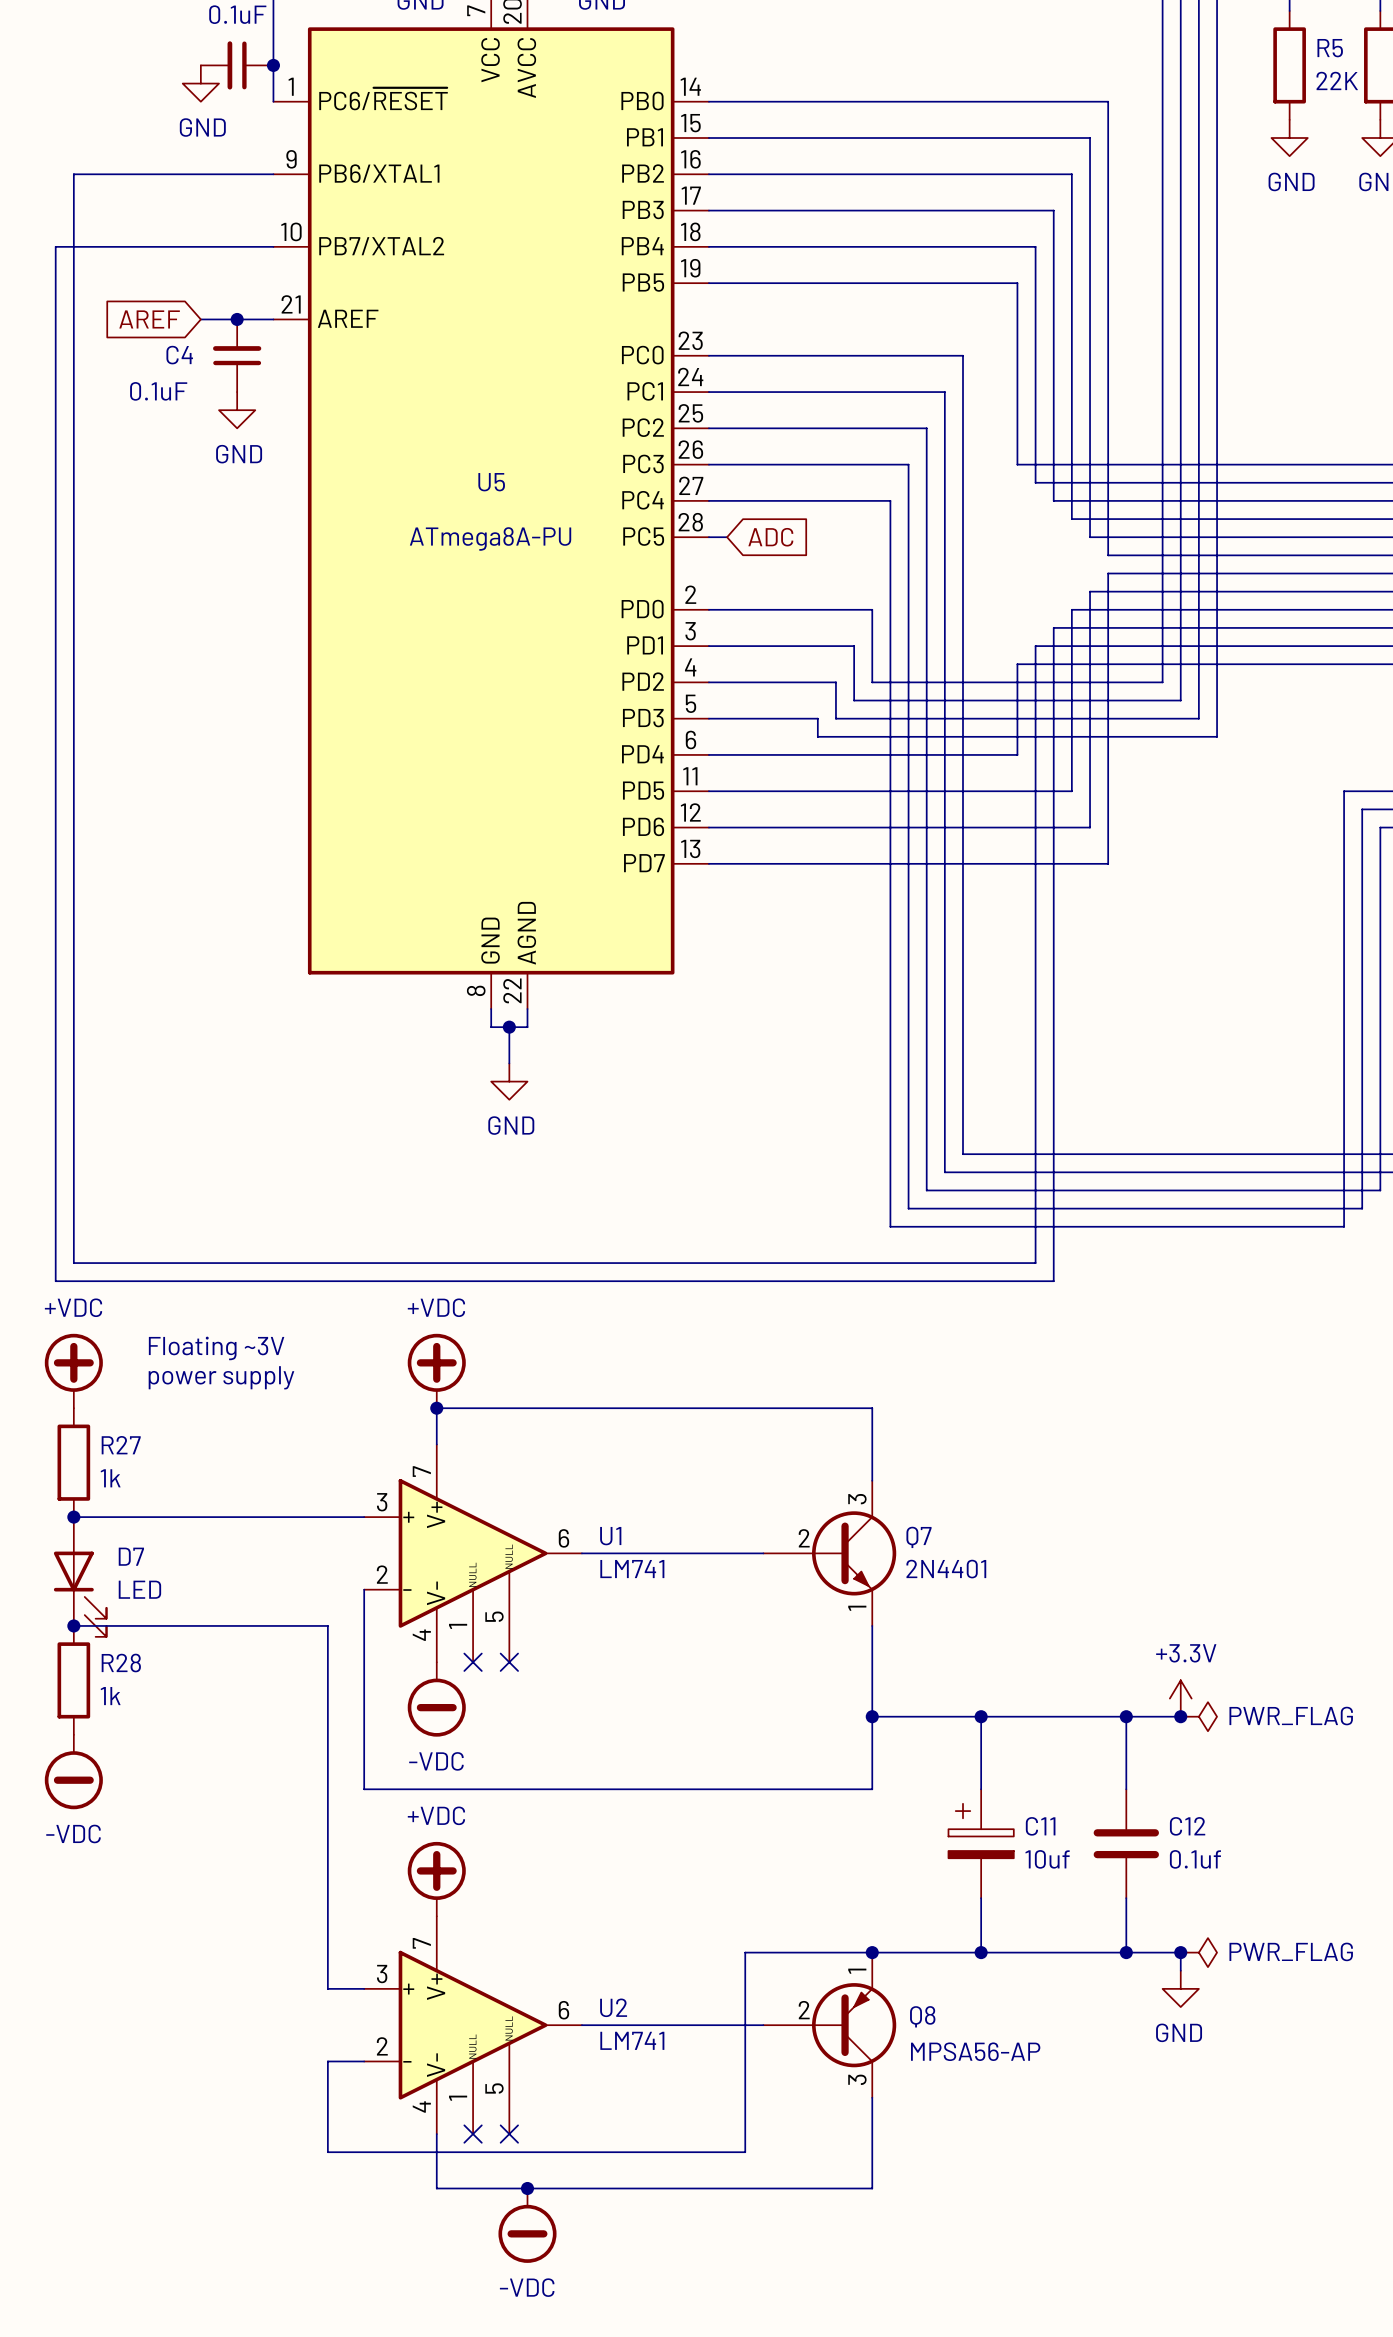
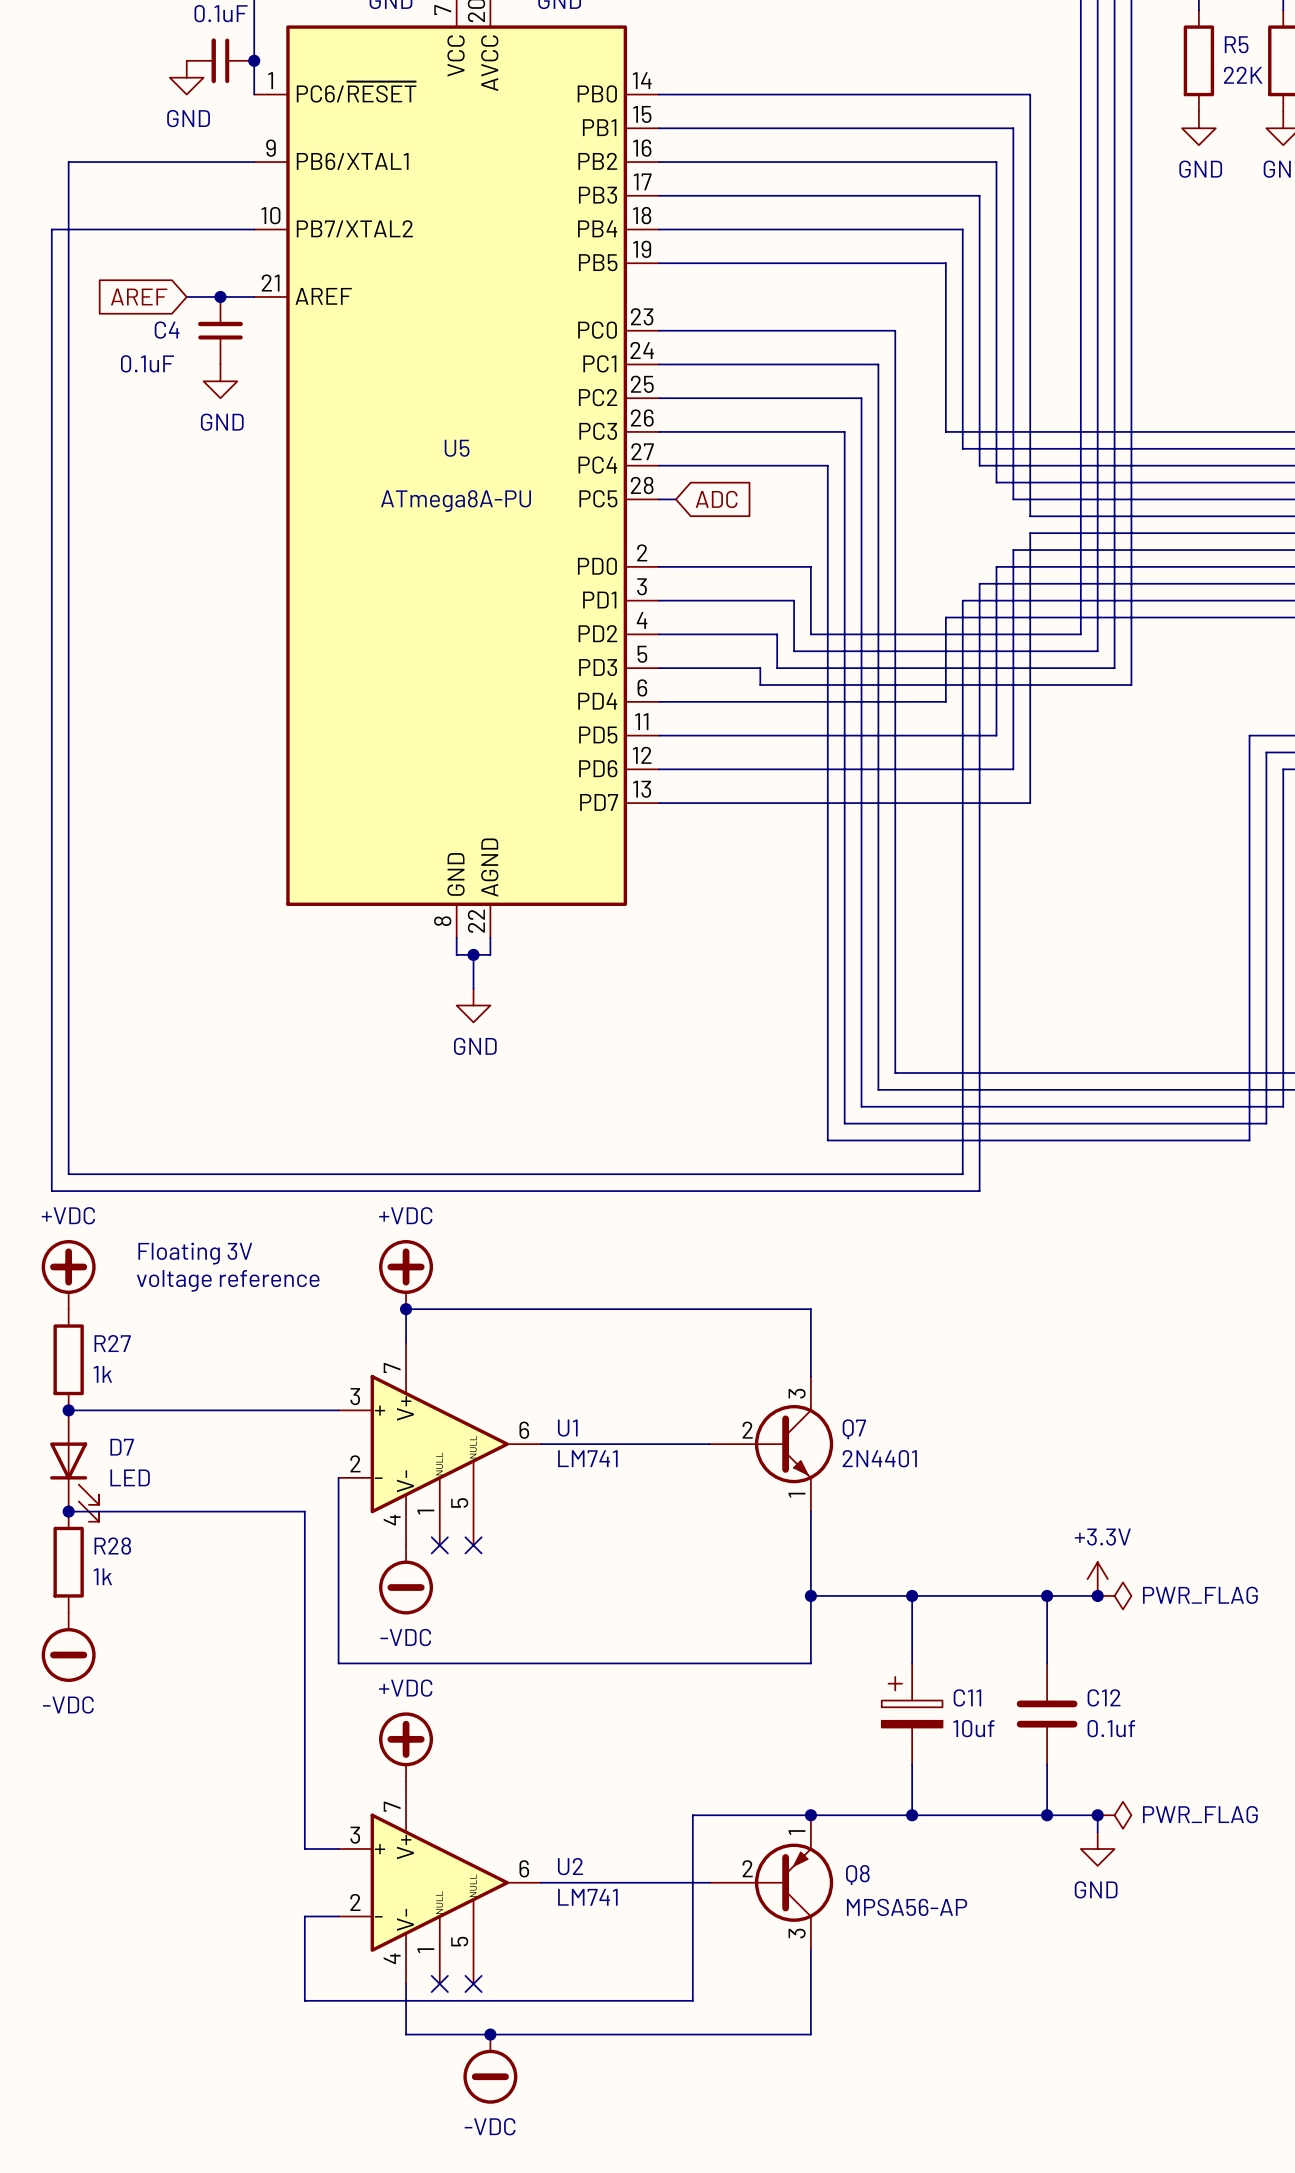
text: Floating ~3V (216, 1348) -> Floating 3V (195, 1253)
text: power supply (221, 1377) -> voltage reference (228, 1280)

